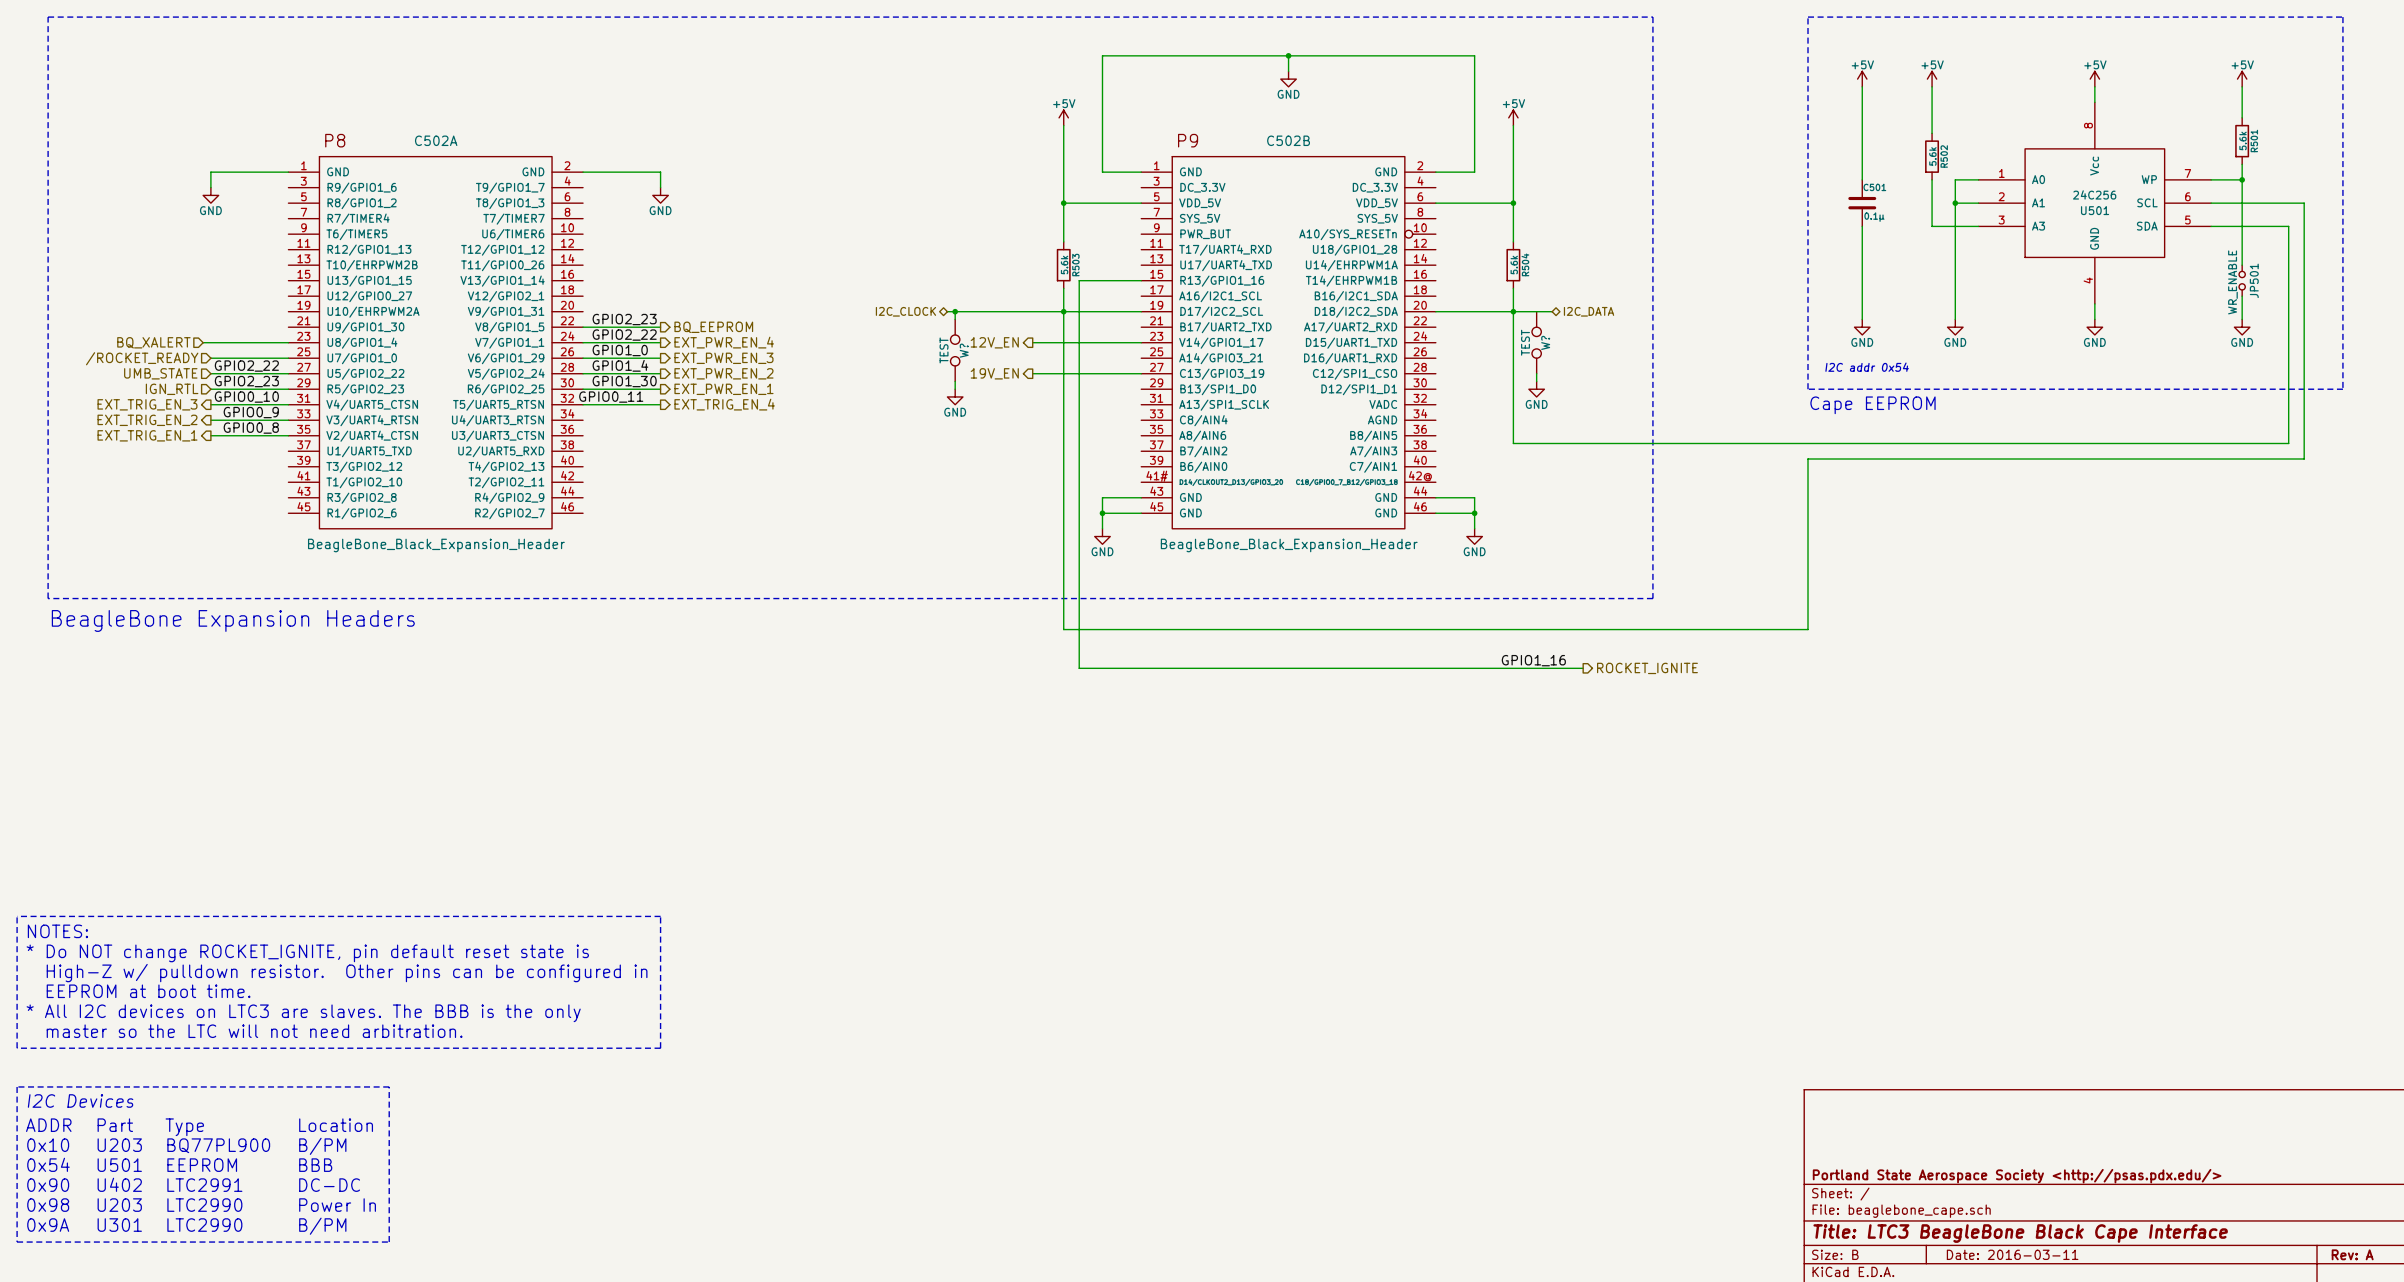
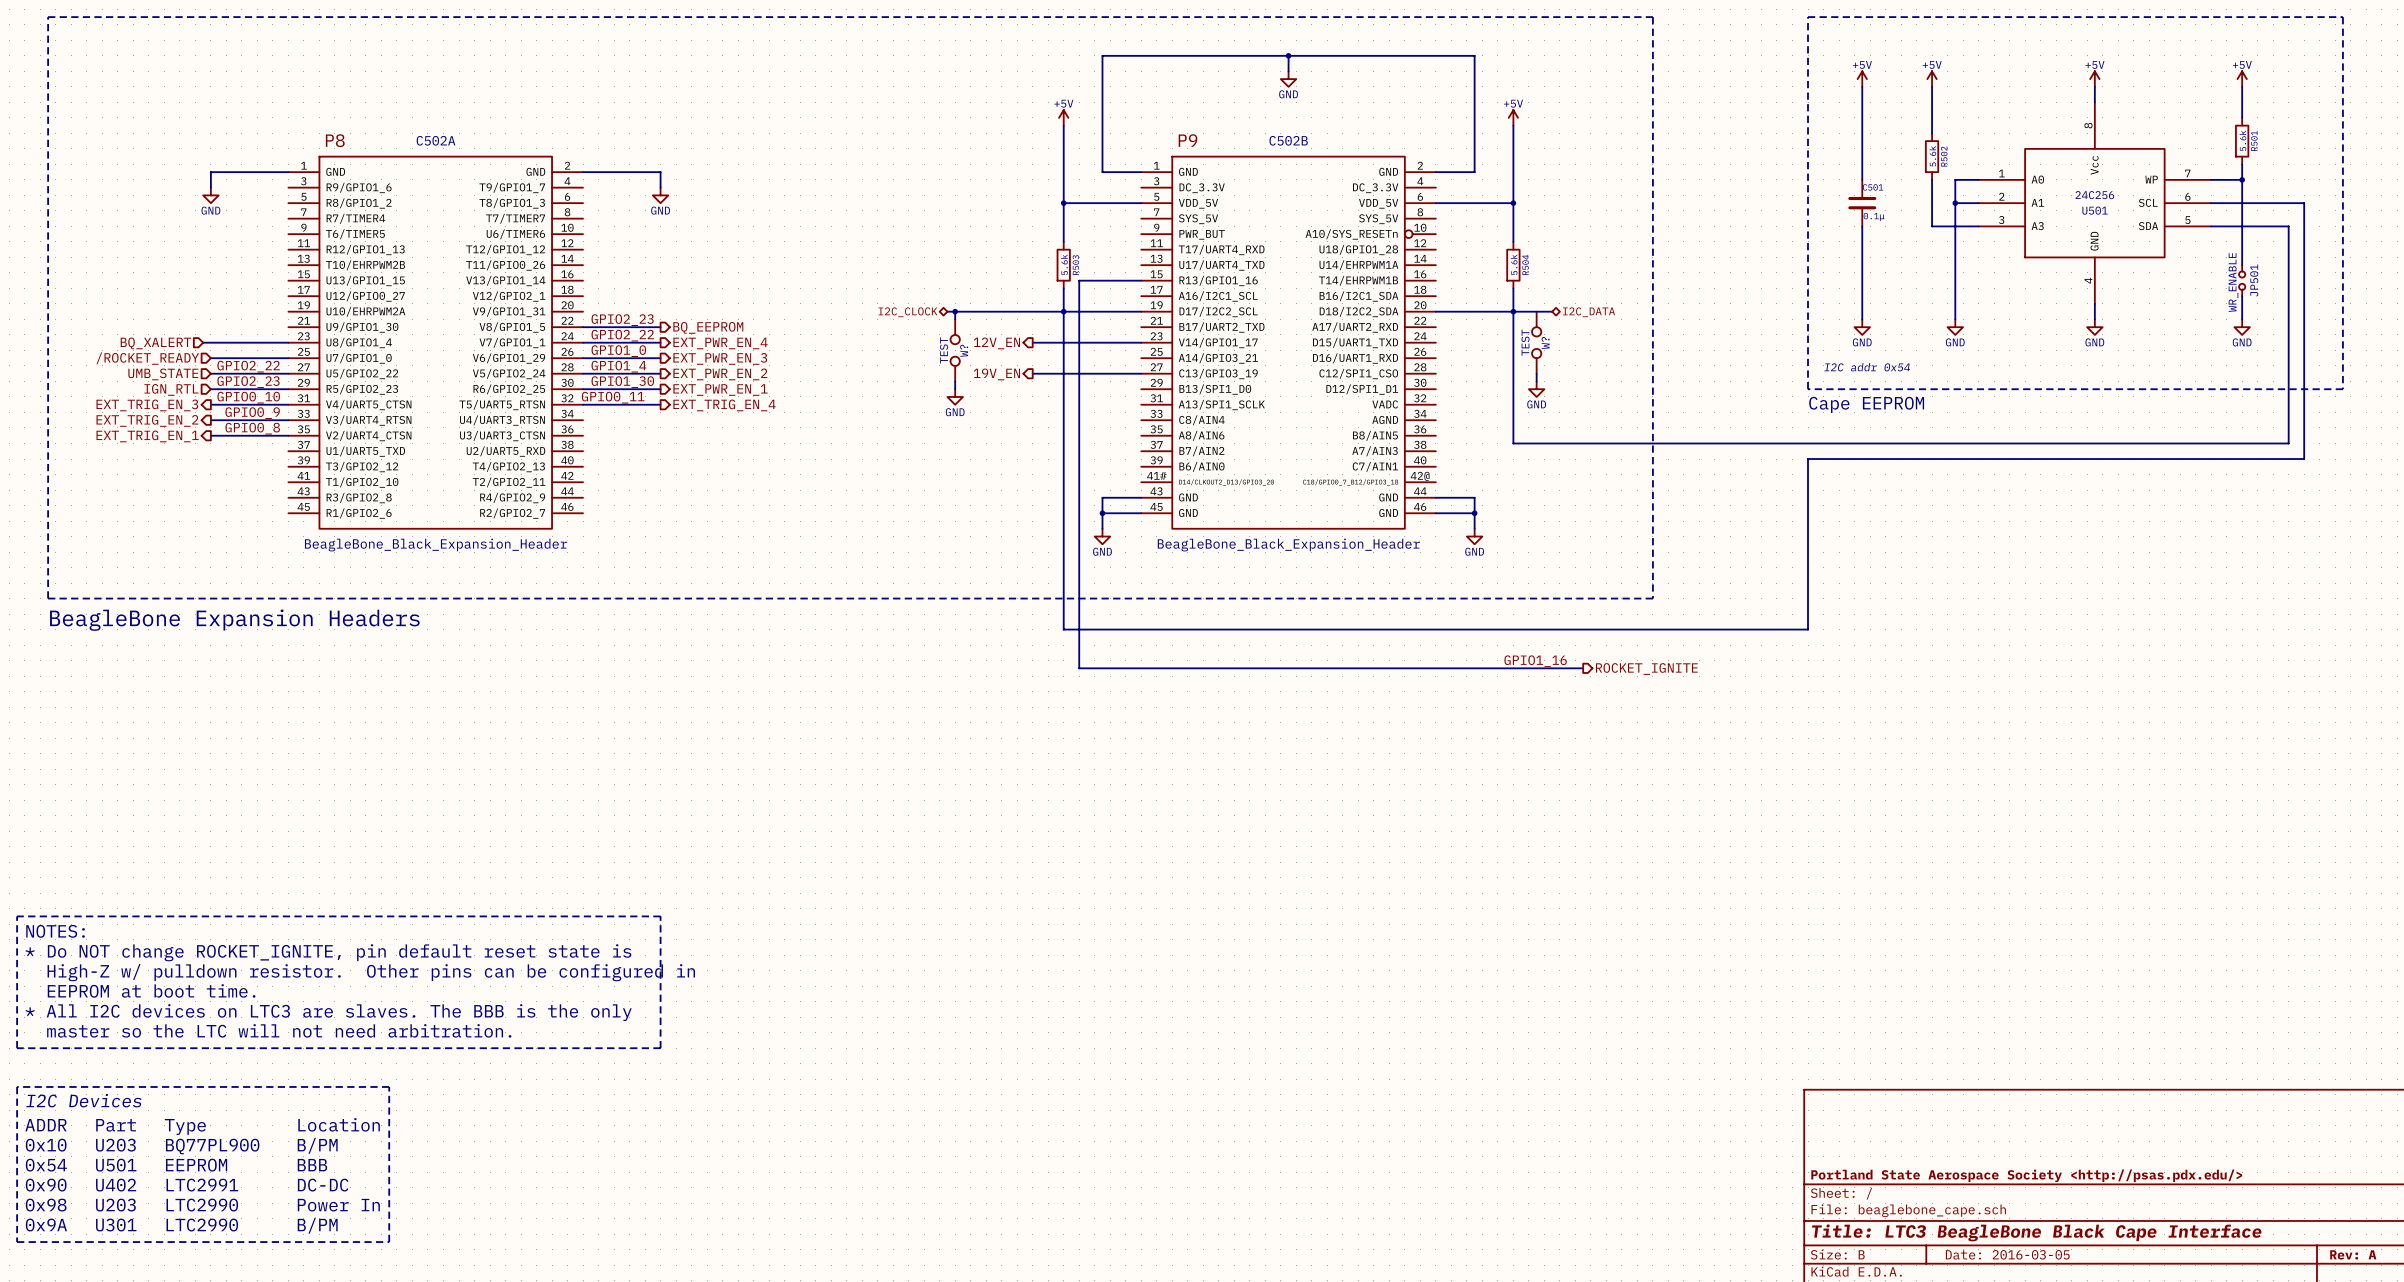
title block: Date: 2016-03-11 (2012, 1254) -> Date: 2016-03-05 (2007, 1254)

